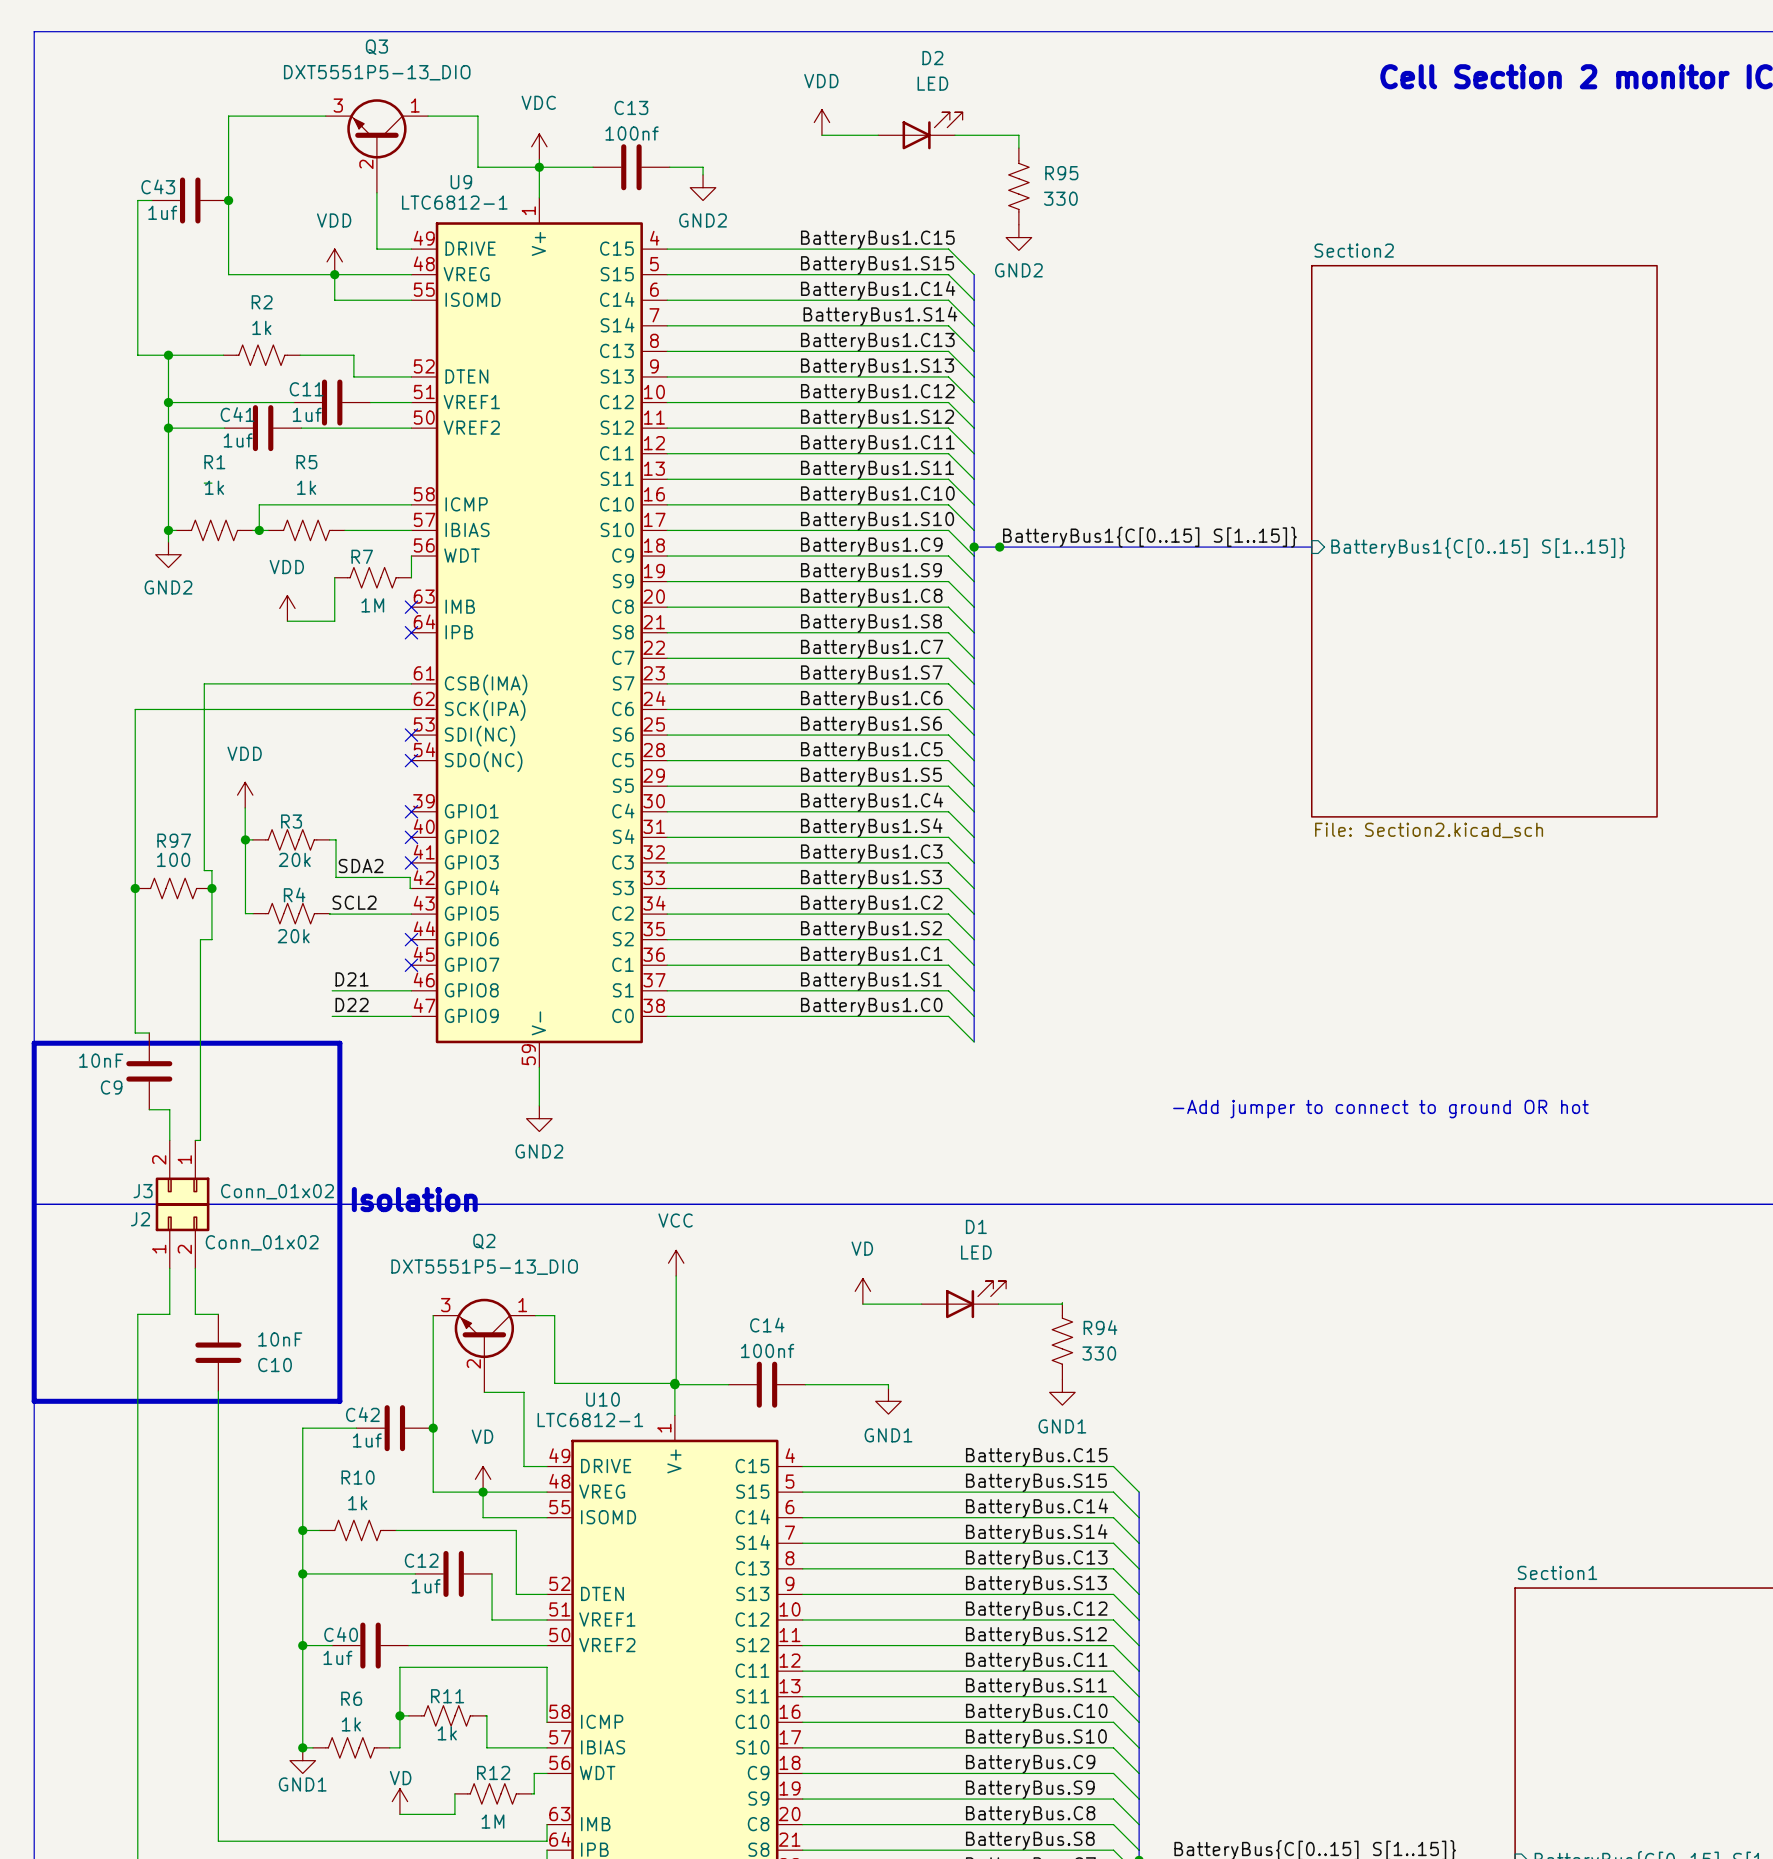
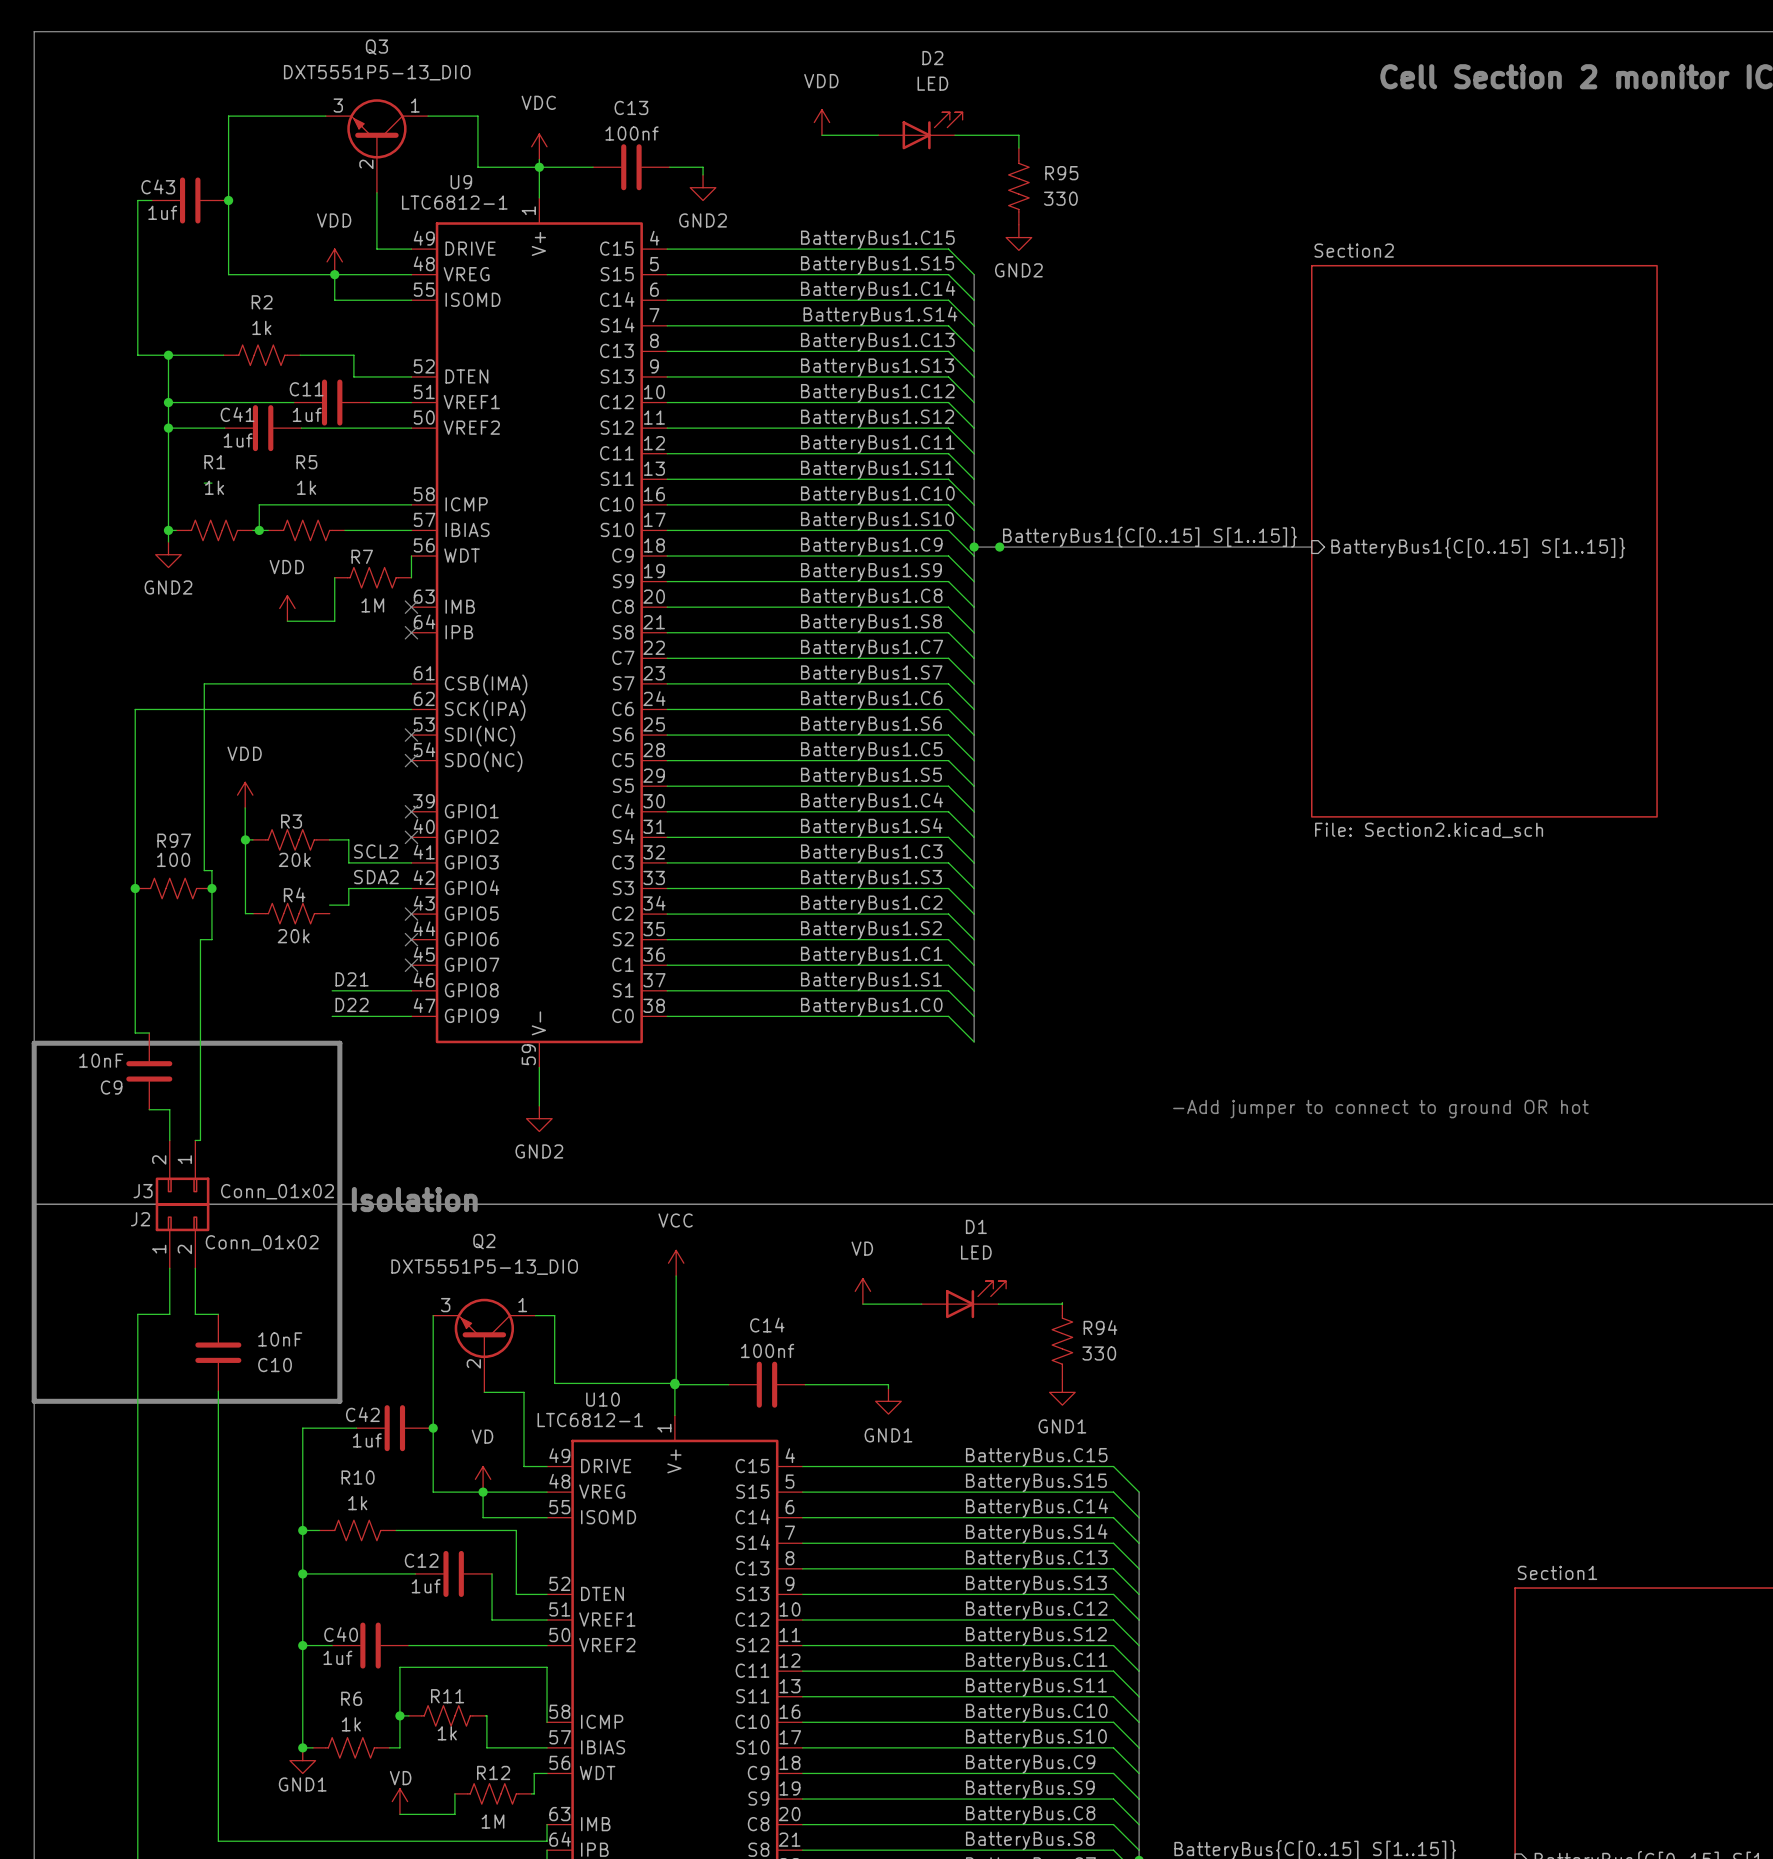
wire: (336, 839) (336, 877) (410, 877) (410, 888) -> (336, 839) (348, 839) (348, 862) (411, 862)
no-connect mark position: (411, 862) -> (411, 914)
label position: SDA2 (361, 866) -> SDA2 (376, 877)
wire: none -> (410, 888) (348, 888) (348, 905) (329, 905)
label position: SCL2 (354, 902) -> SCL2 (376, 851)
wire: (329, 913) (411, 914) -> none

